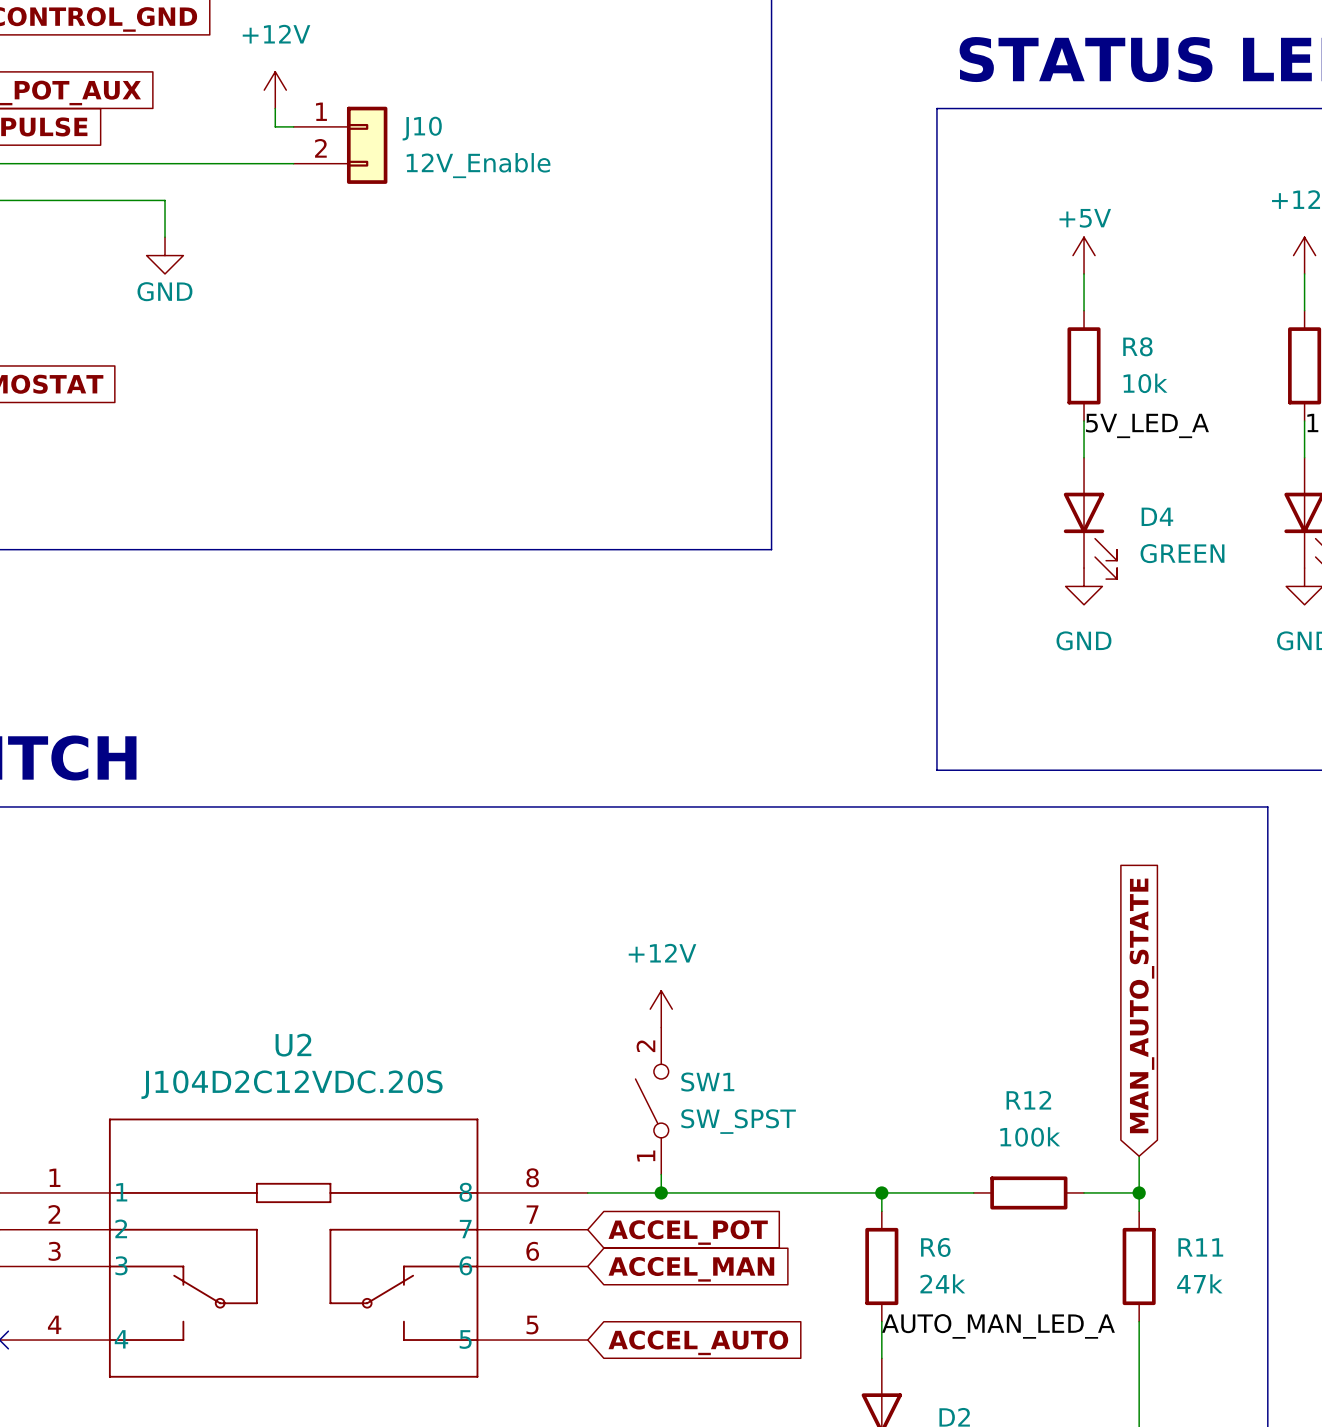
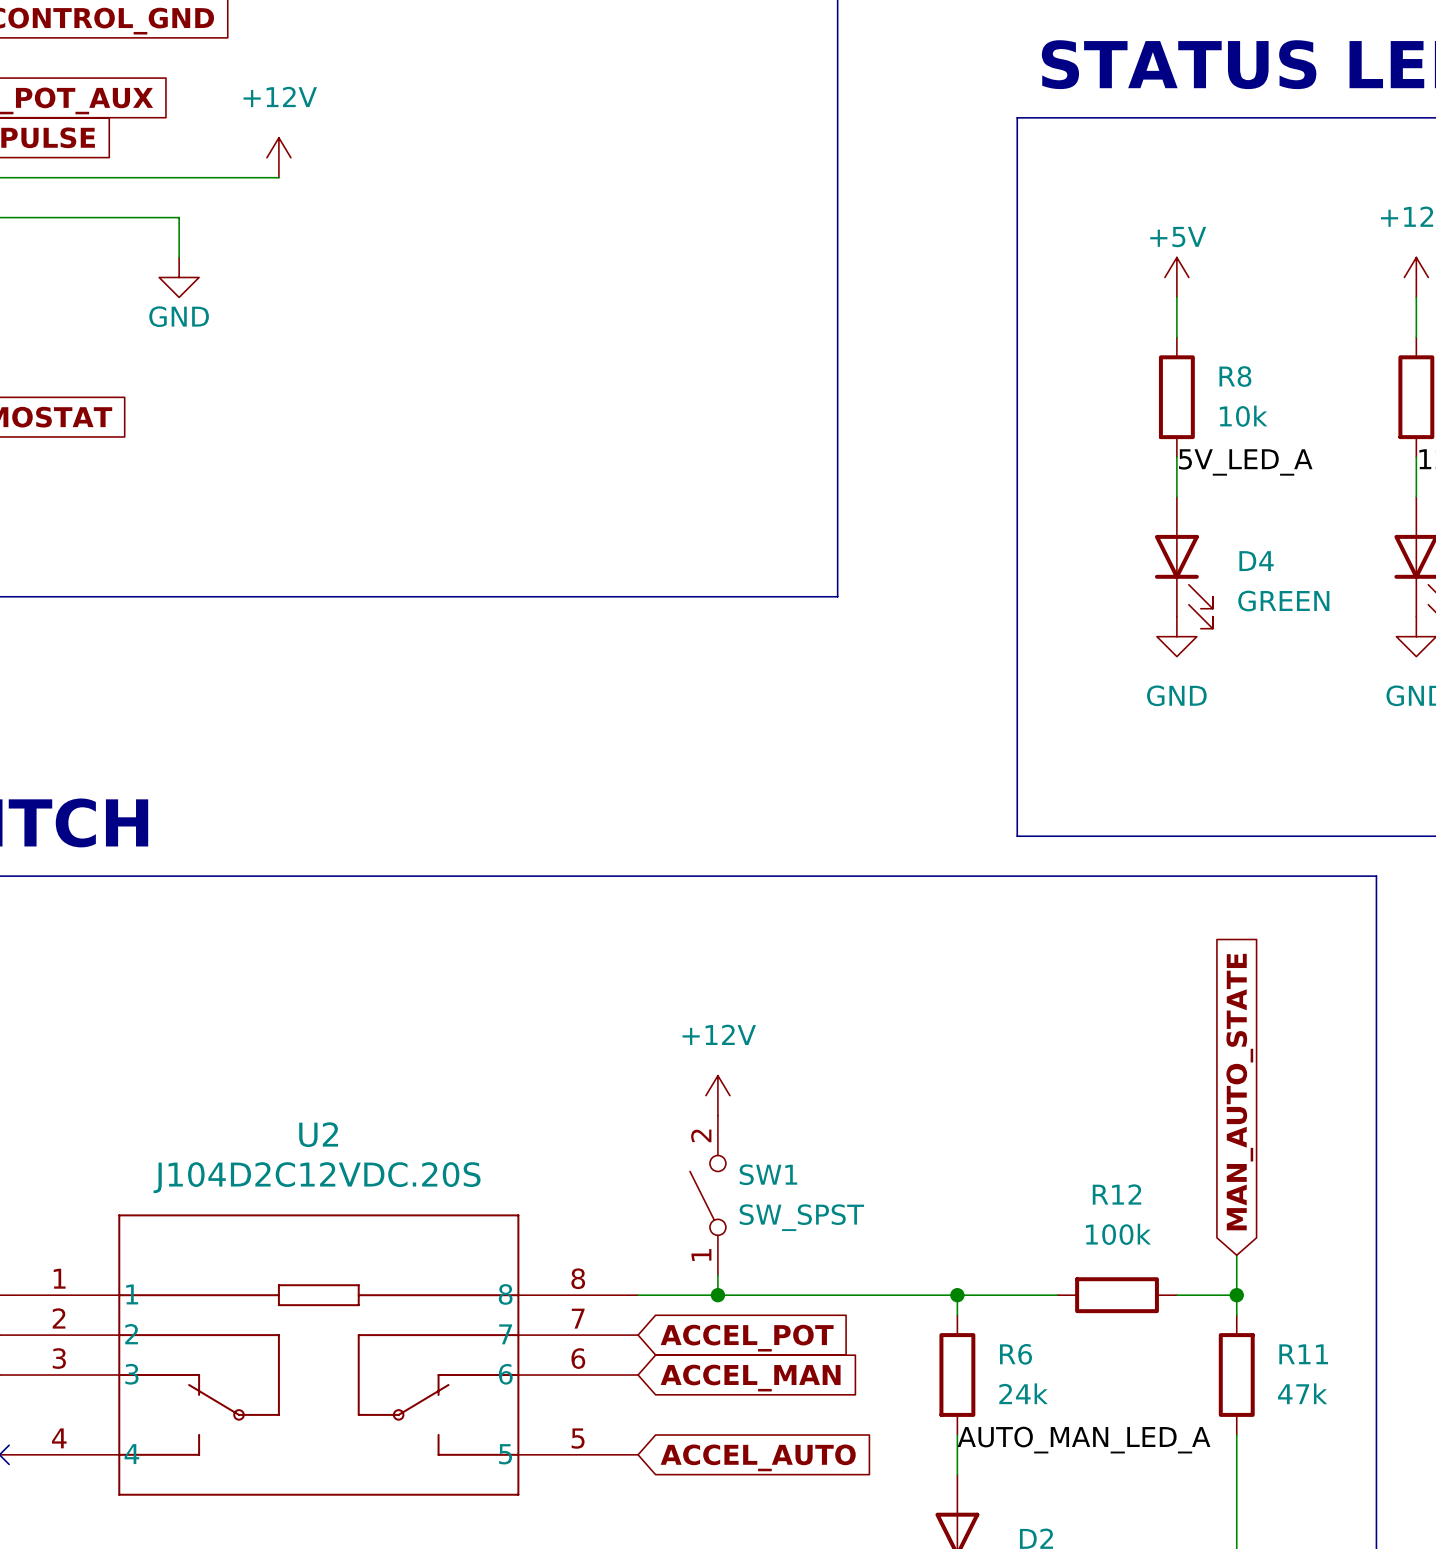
power symbol position: +12V (275, 90) -> +12V (278, 157)
wire: (275, 108) (275, 126) (293, 126) -> none
J10: 12V_Enable (340, 145) -> none
wire: (256, 163) (293, 163) -> none

